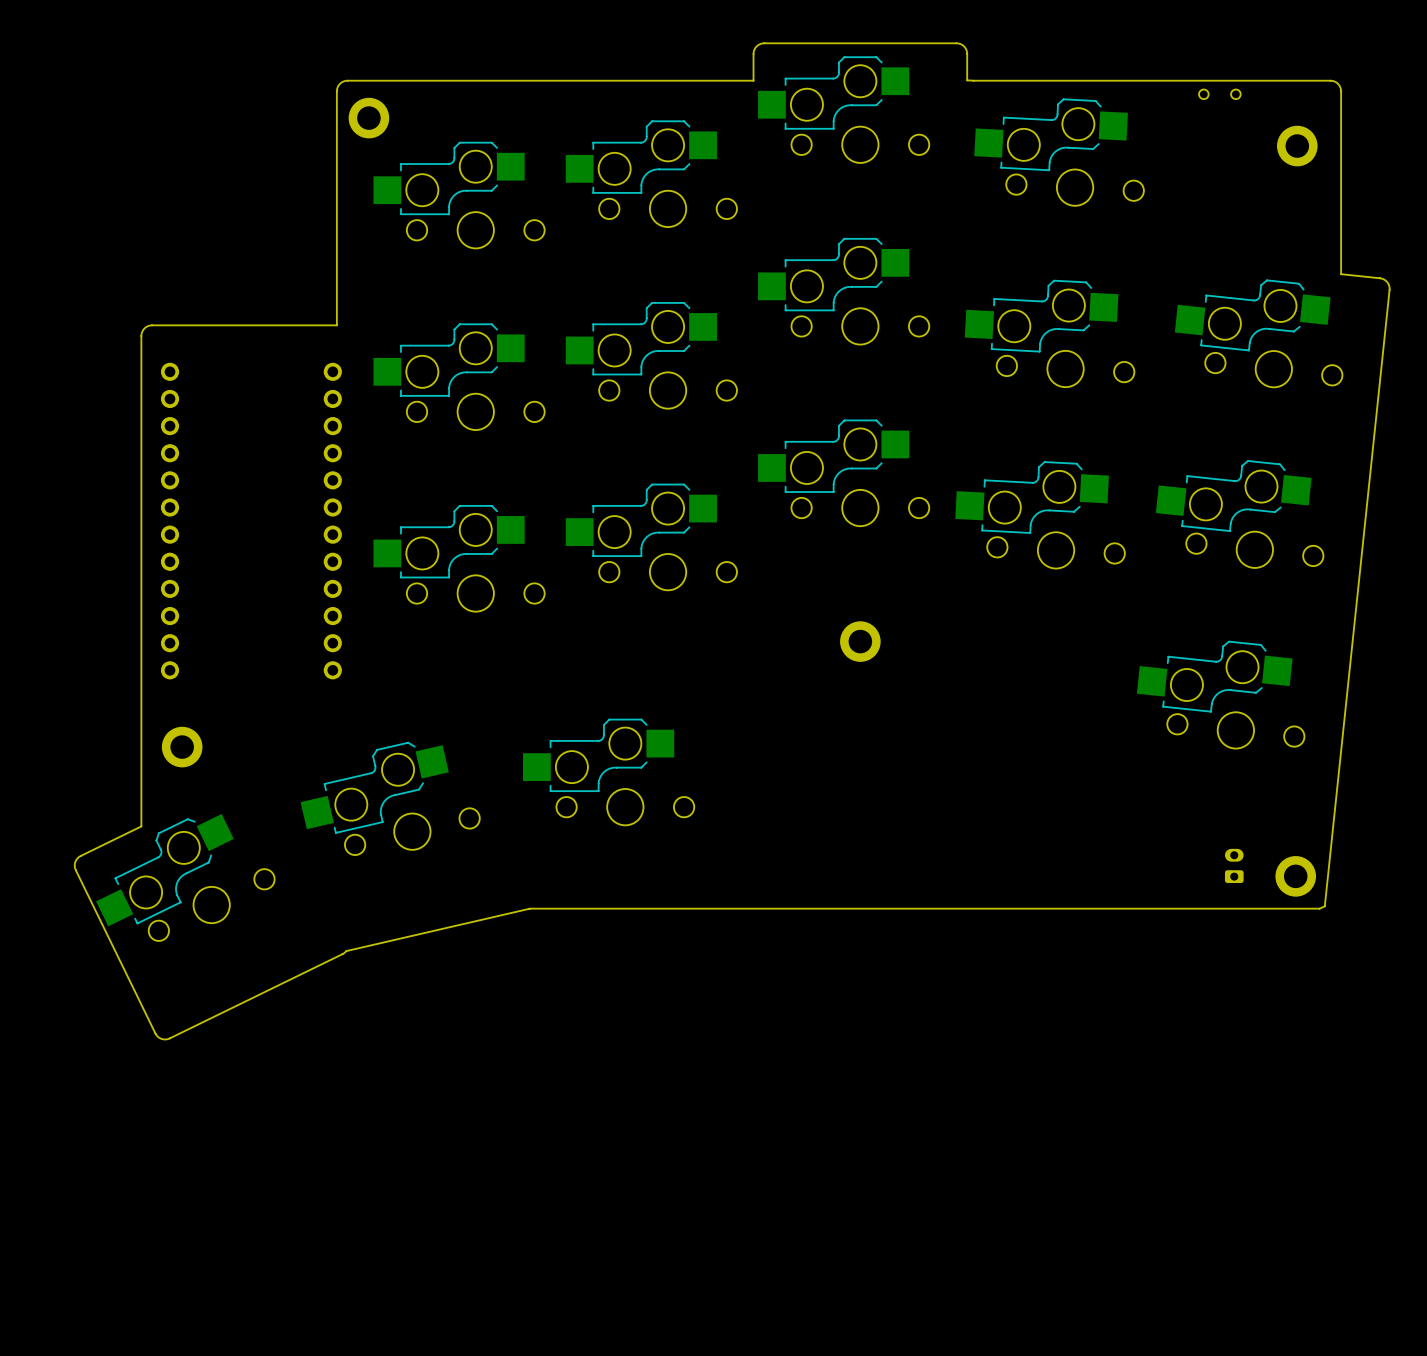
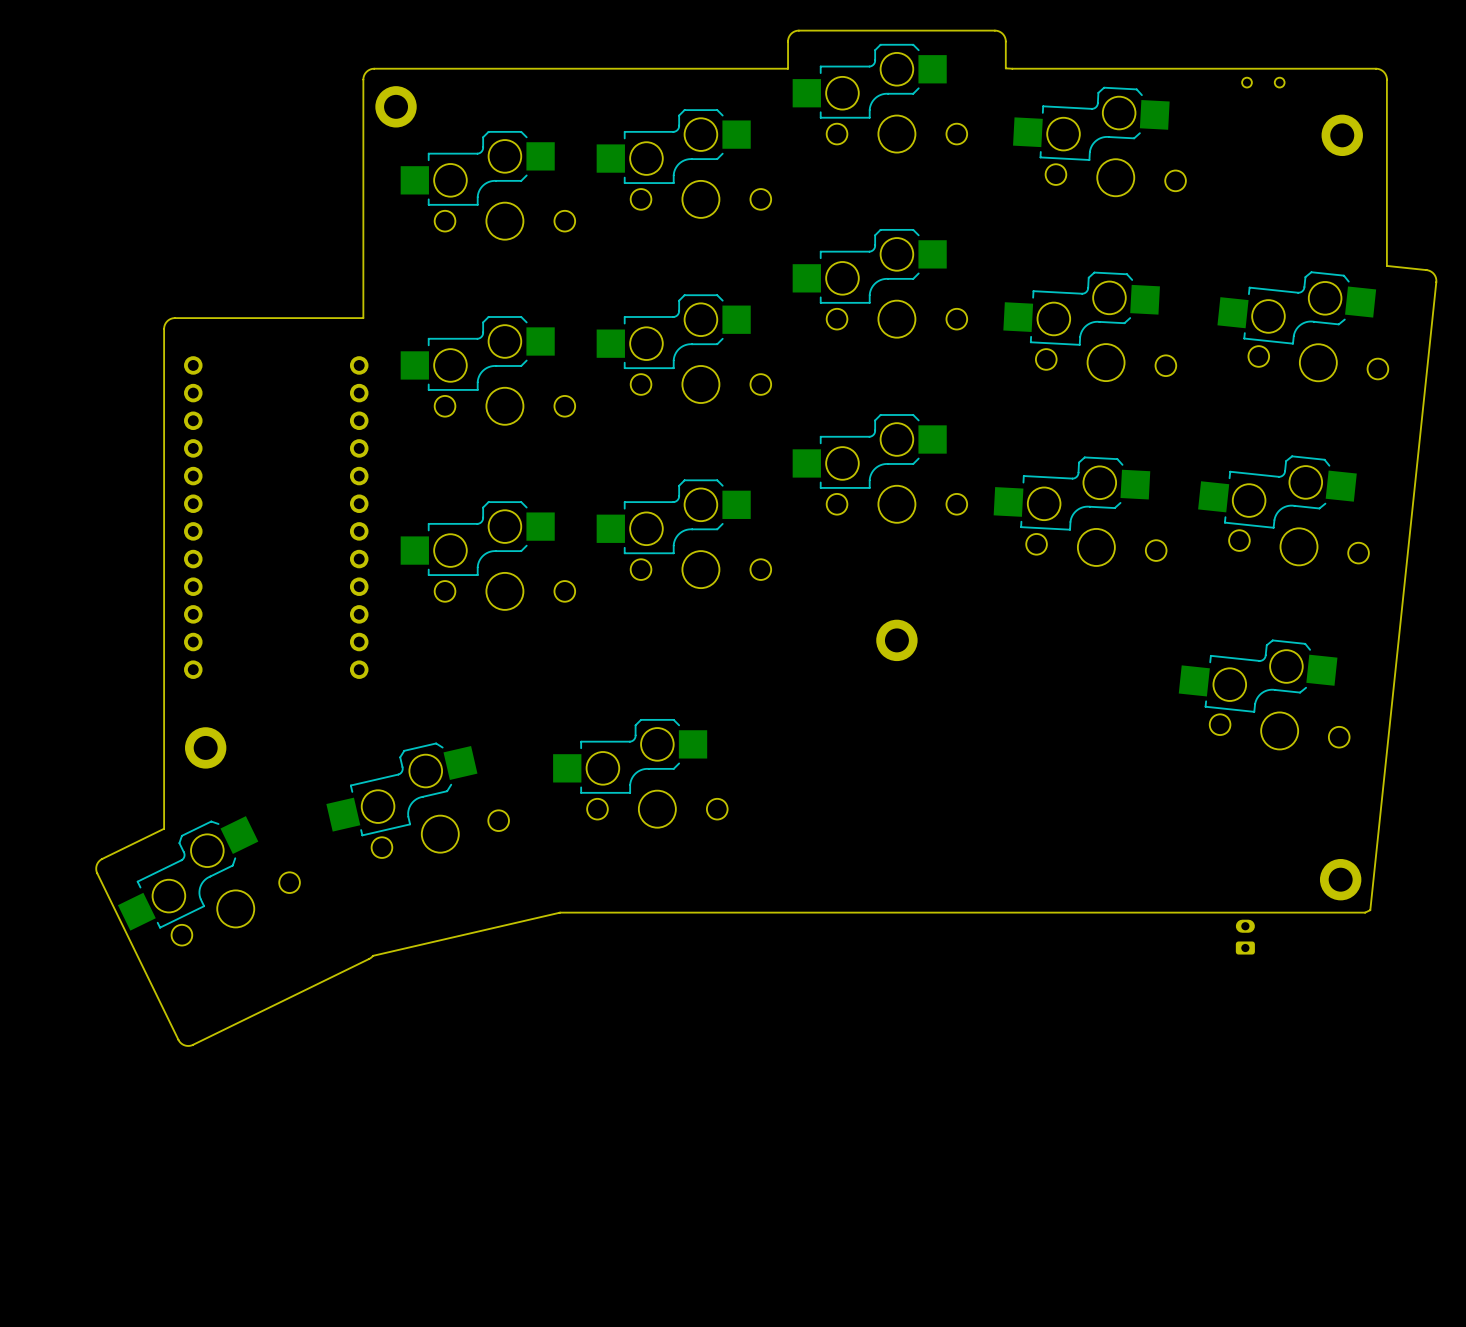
part position: (1234, 865) -> (1245, 937)

